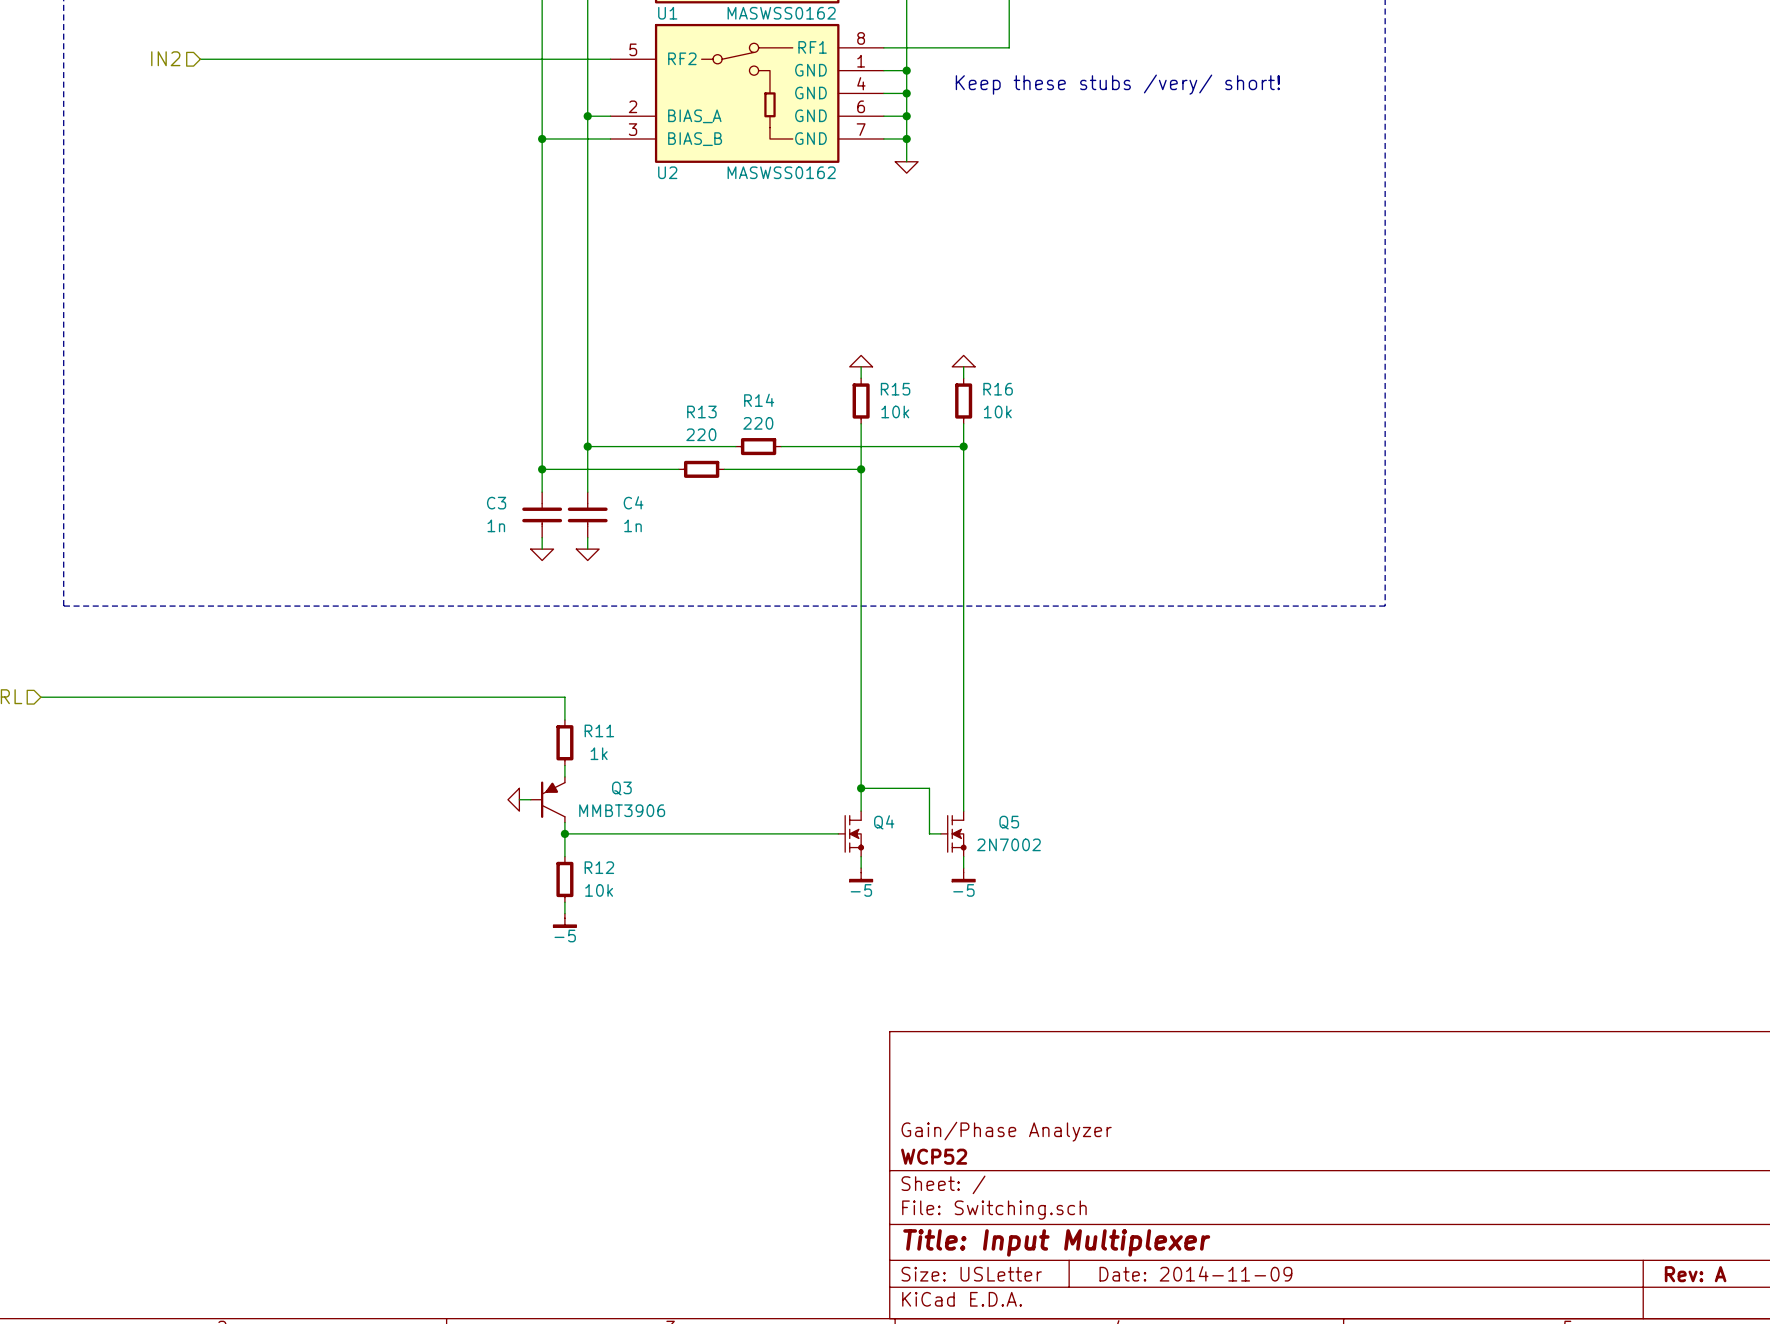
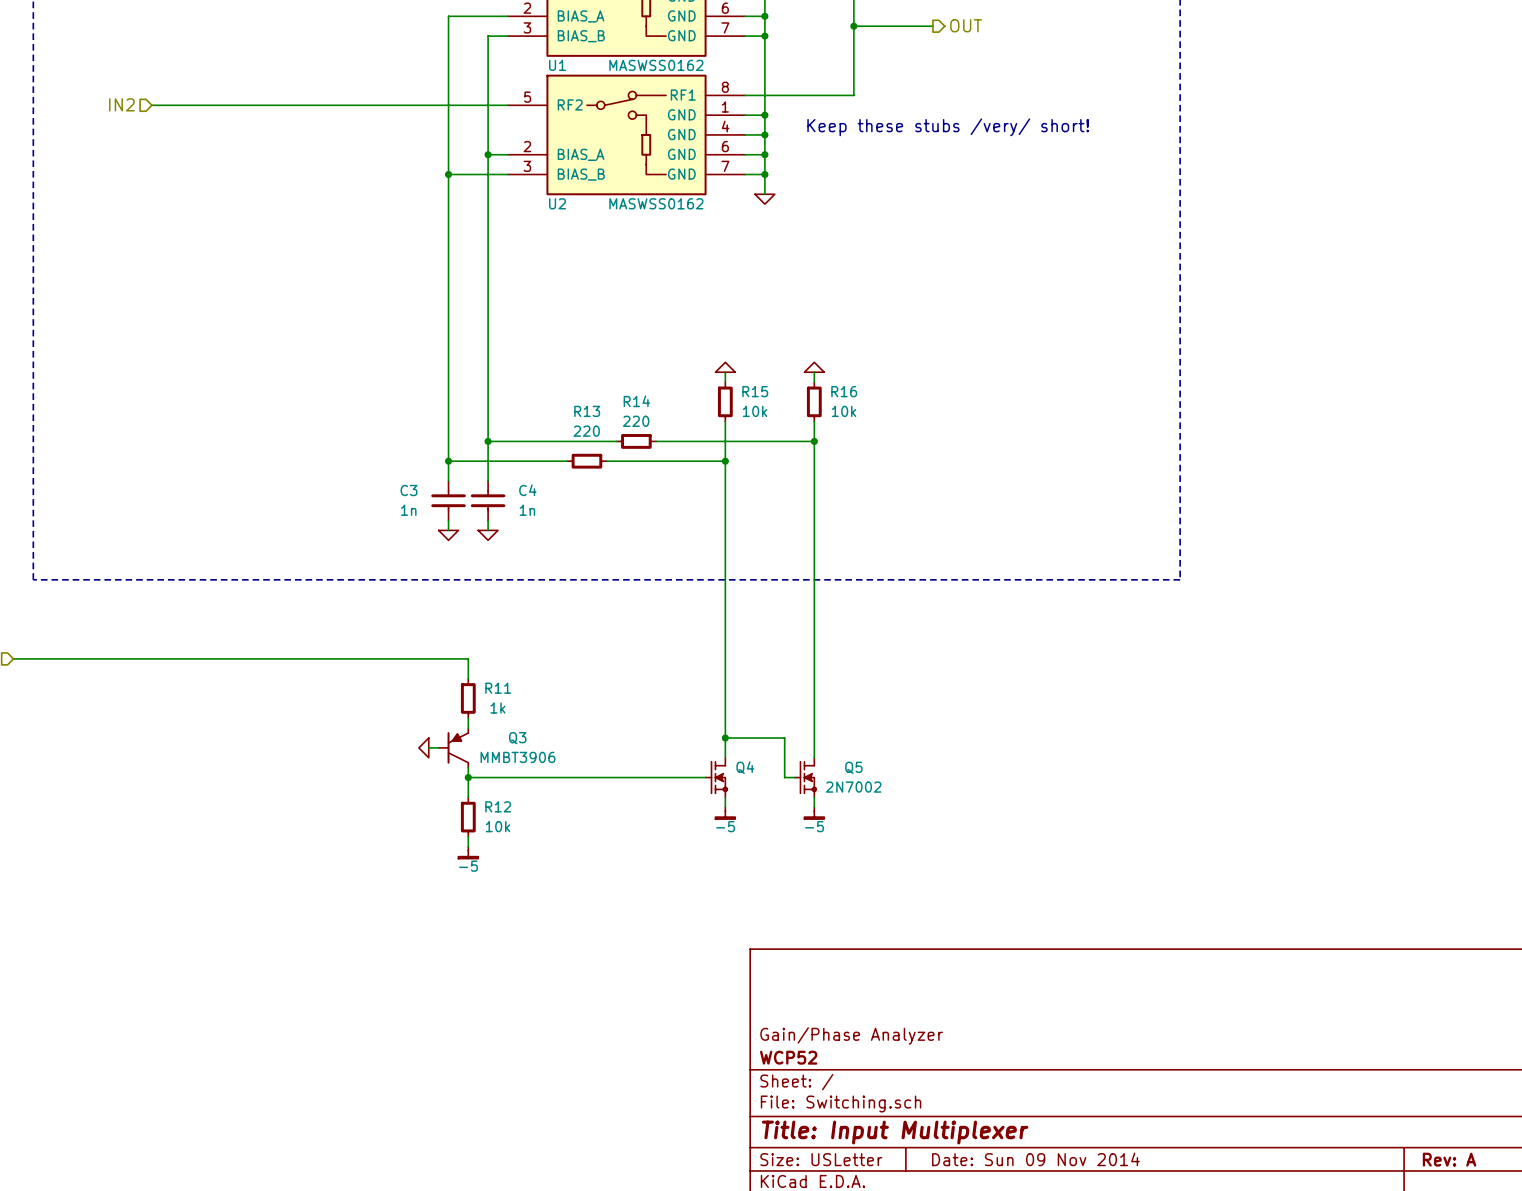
title block: Date: 2014-11-09 (1195, 1273) -> Date: Sun 09 Nov 2014 (1035, 1159)

